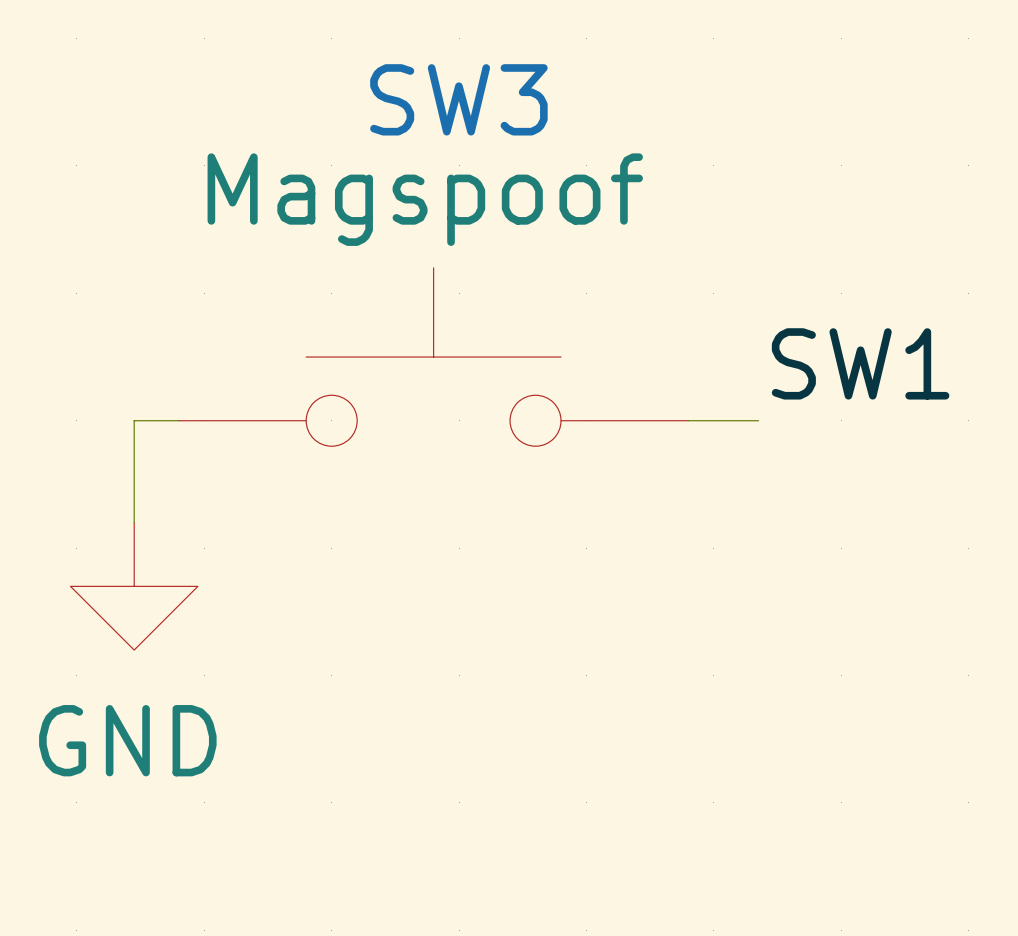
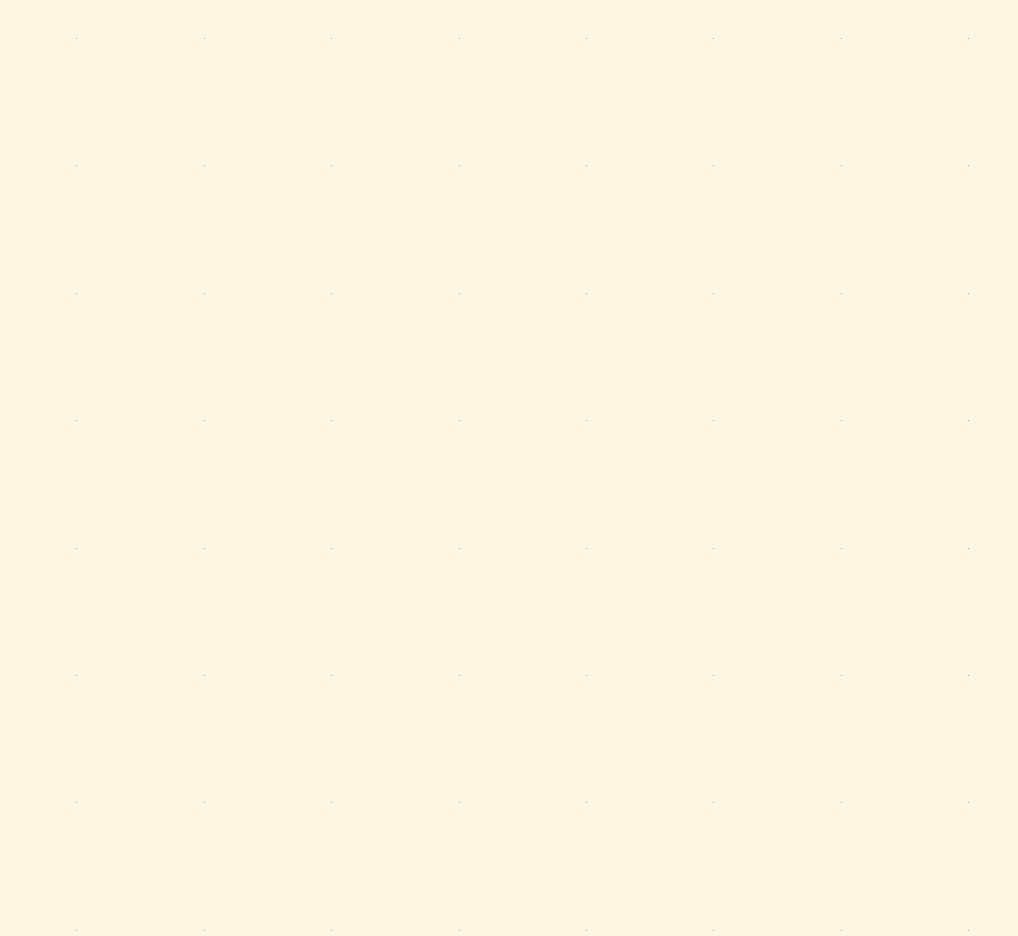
SW3: Magspoof (433, 357) -> none
label: SW1 (860, 363) -> none
wire: (178, 420) (134, 420) (134, 522) -> none
wire: (688, 420) (758, 420) -> none
power symbol: GND (134, 586) -> none

